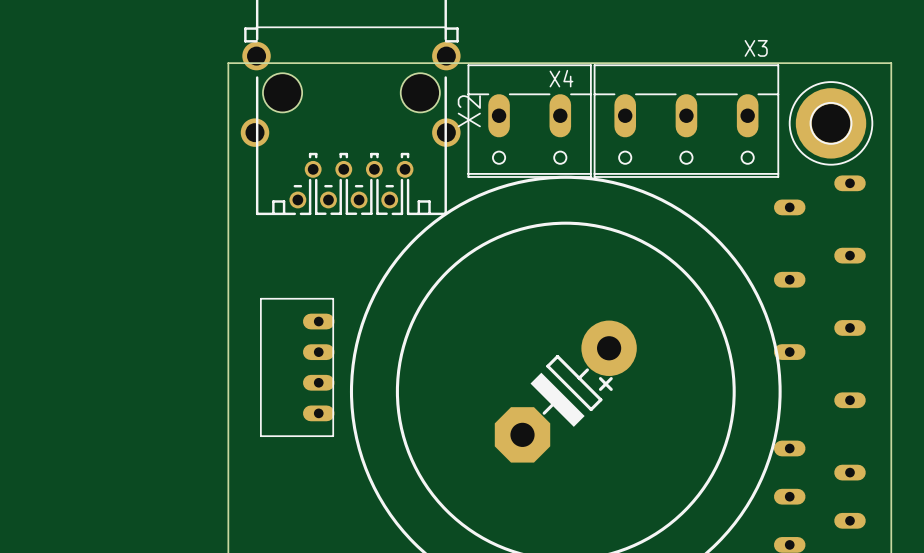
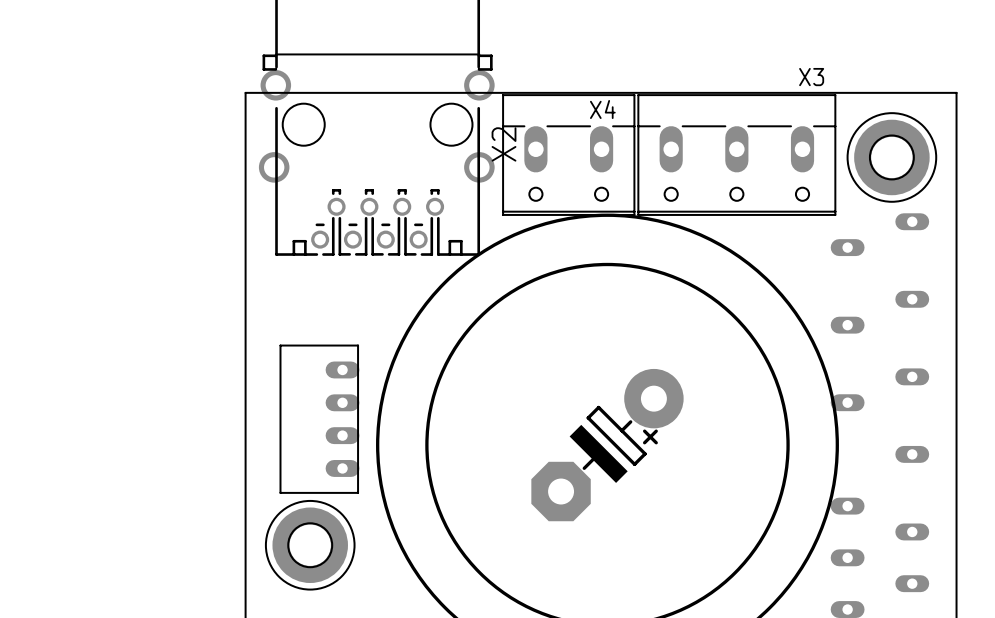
part: none -> (310, 545)

